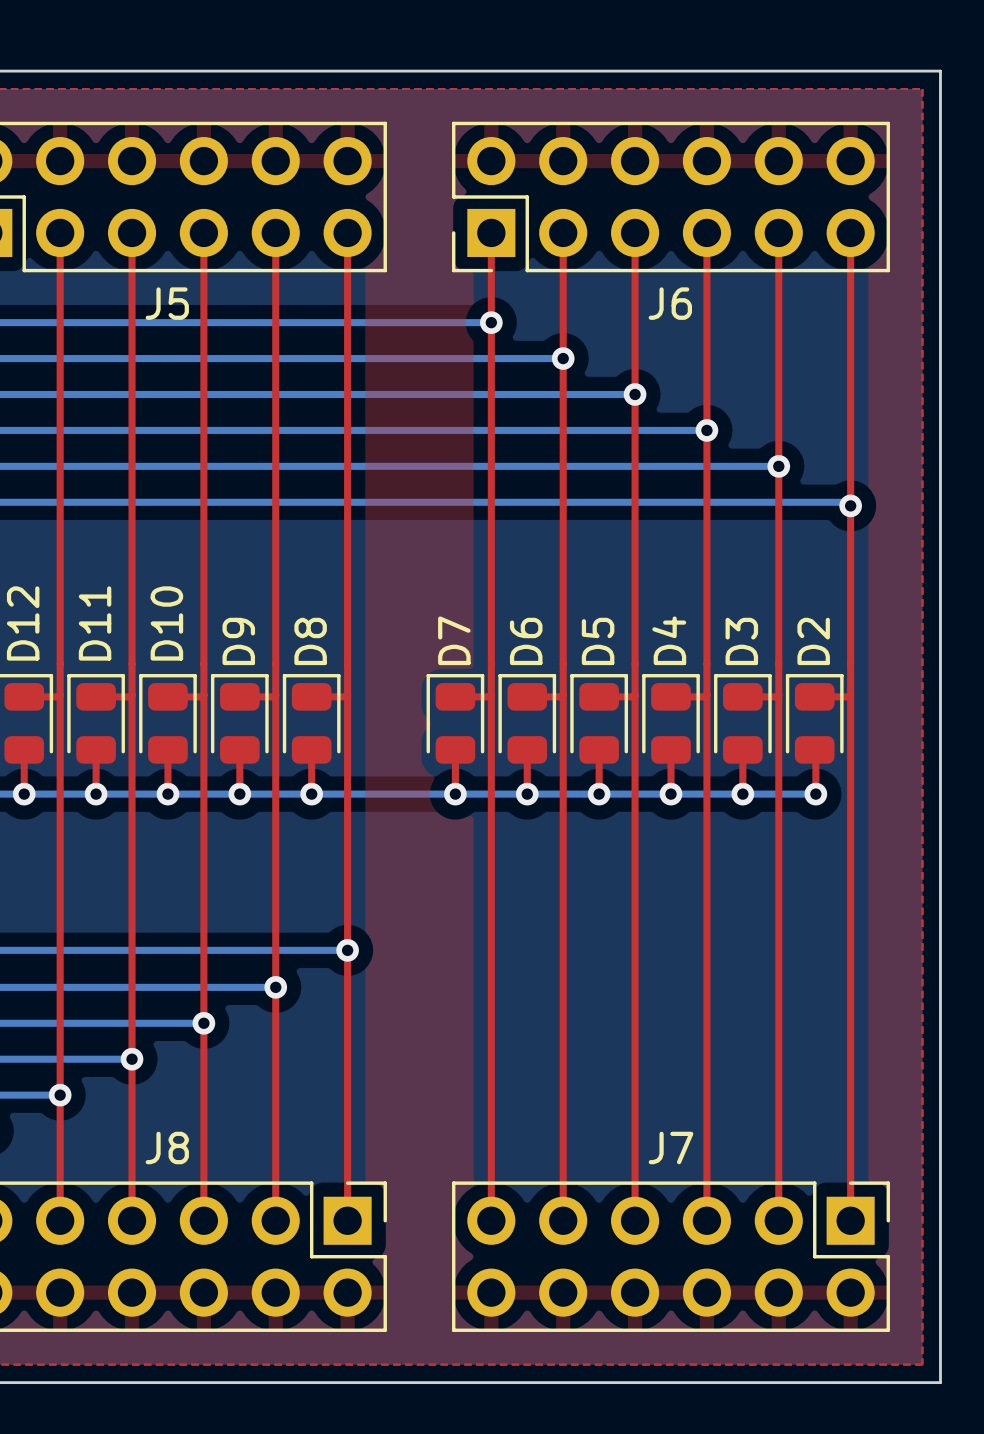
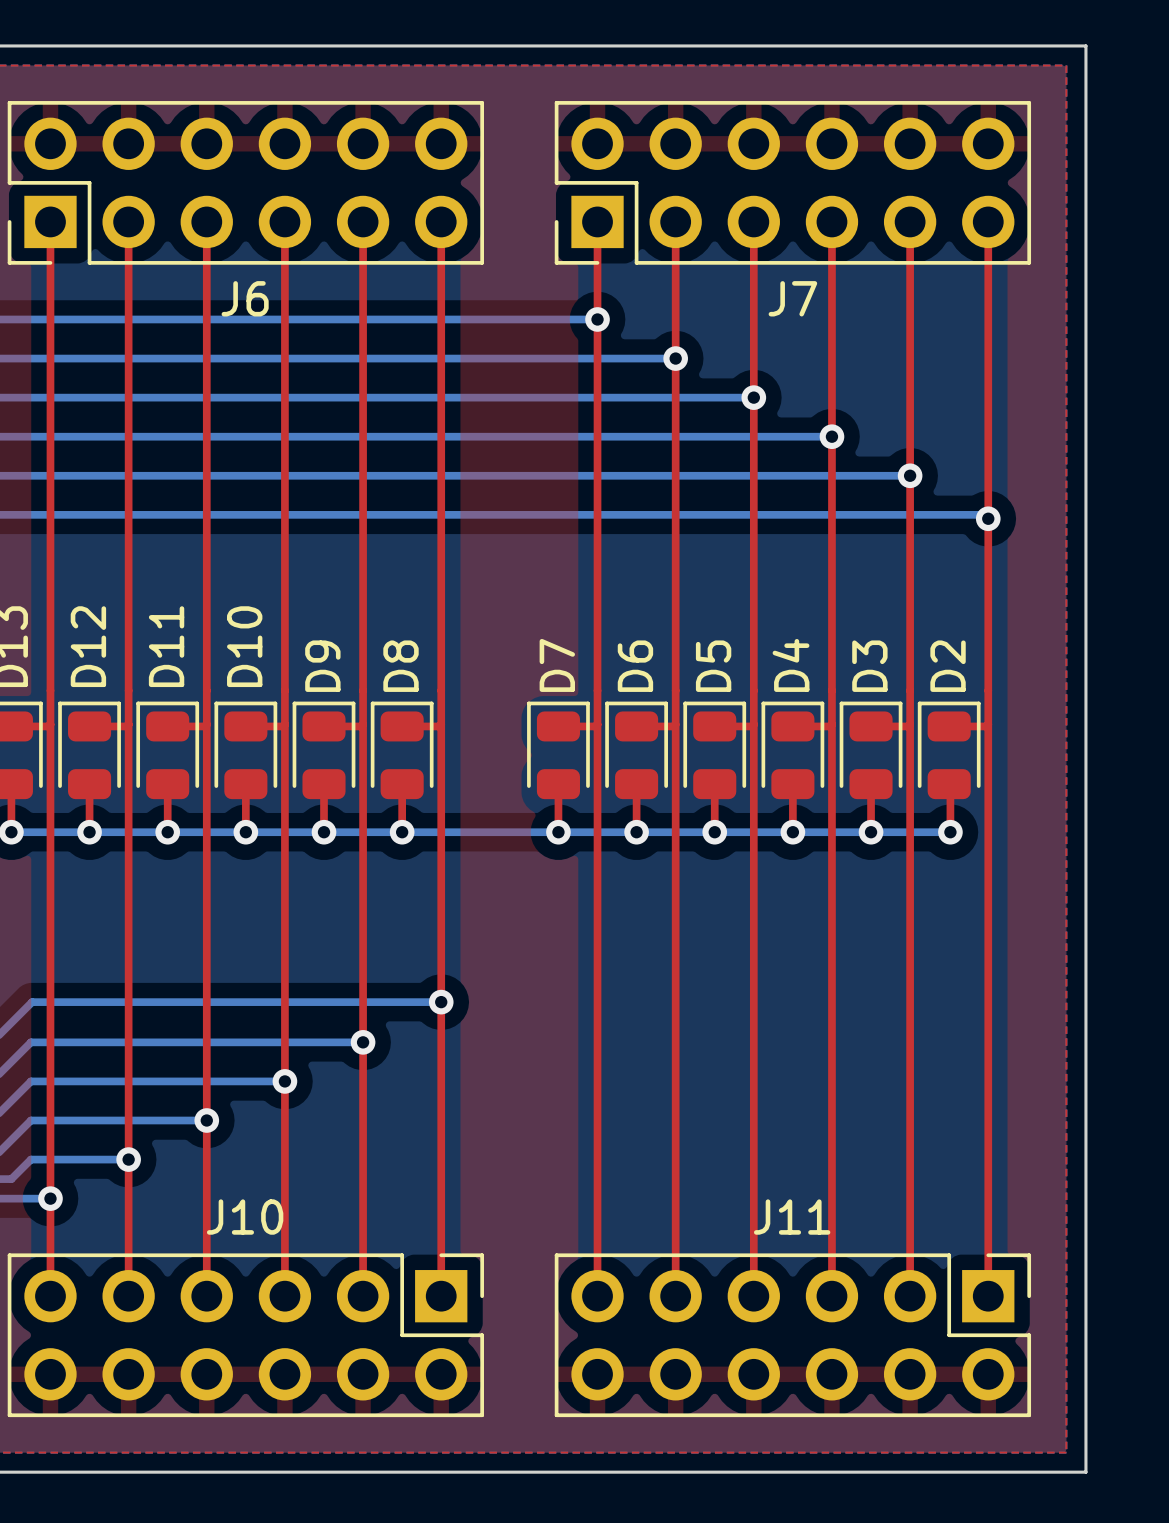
J5 name: J5 (167, 303) -> J6 (245, 298)
J6 name: J6 (670, 303) -> J7 (792, 298)
J8 name: J8 (167, 1147) -> J10 (245, 1217)
J7 name: J7 (671, 1147) -> J11 (792, 1217)

